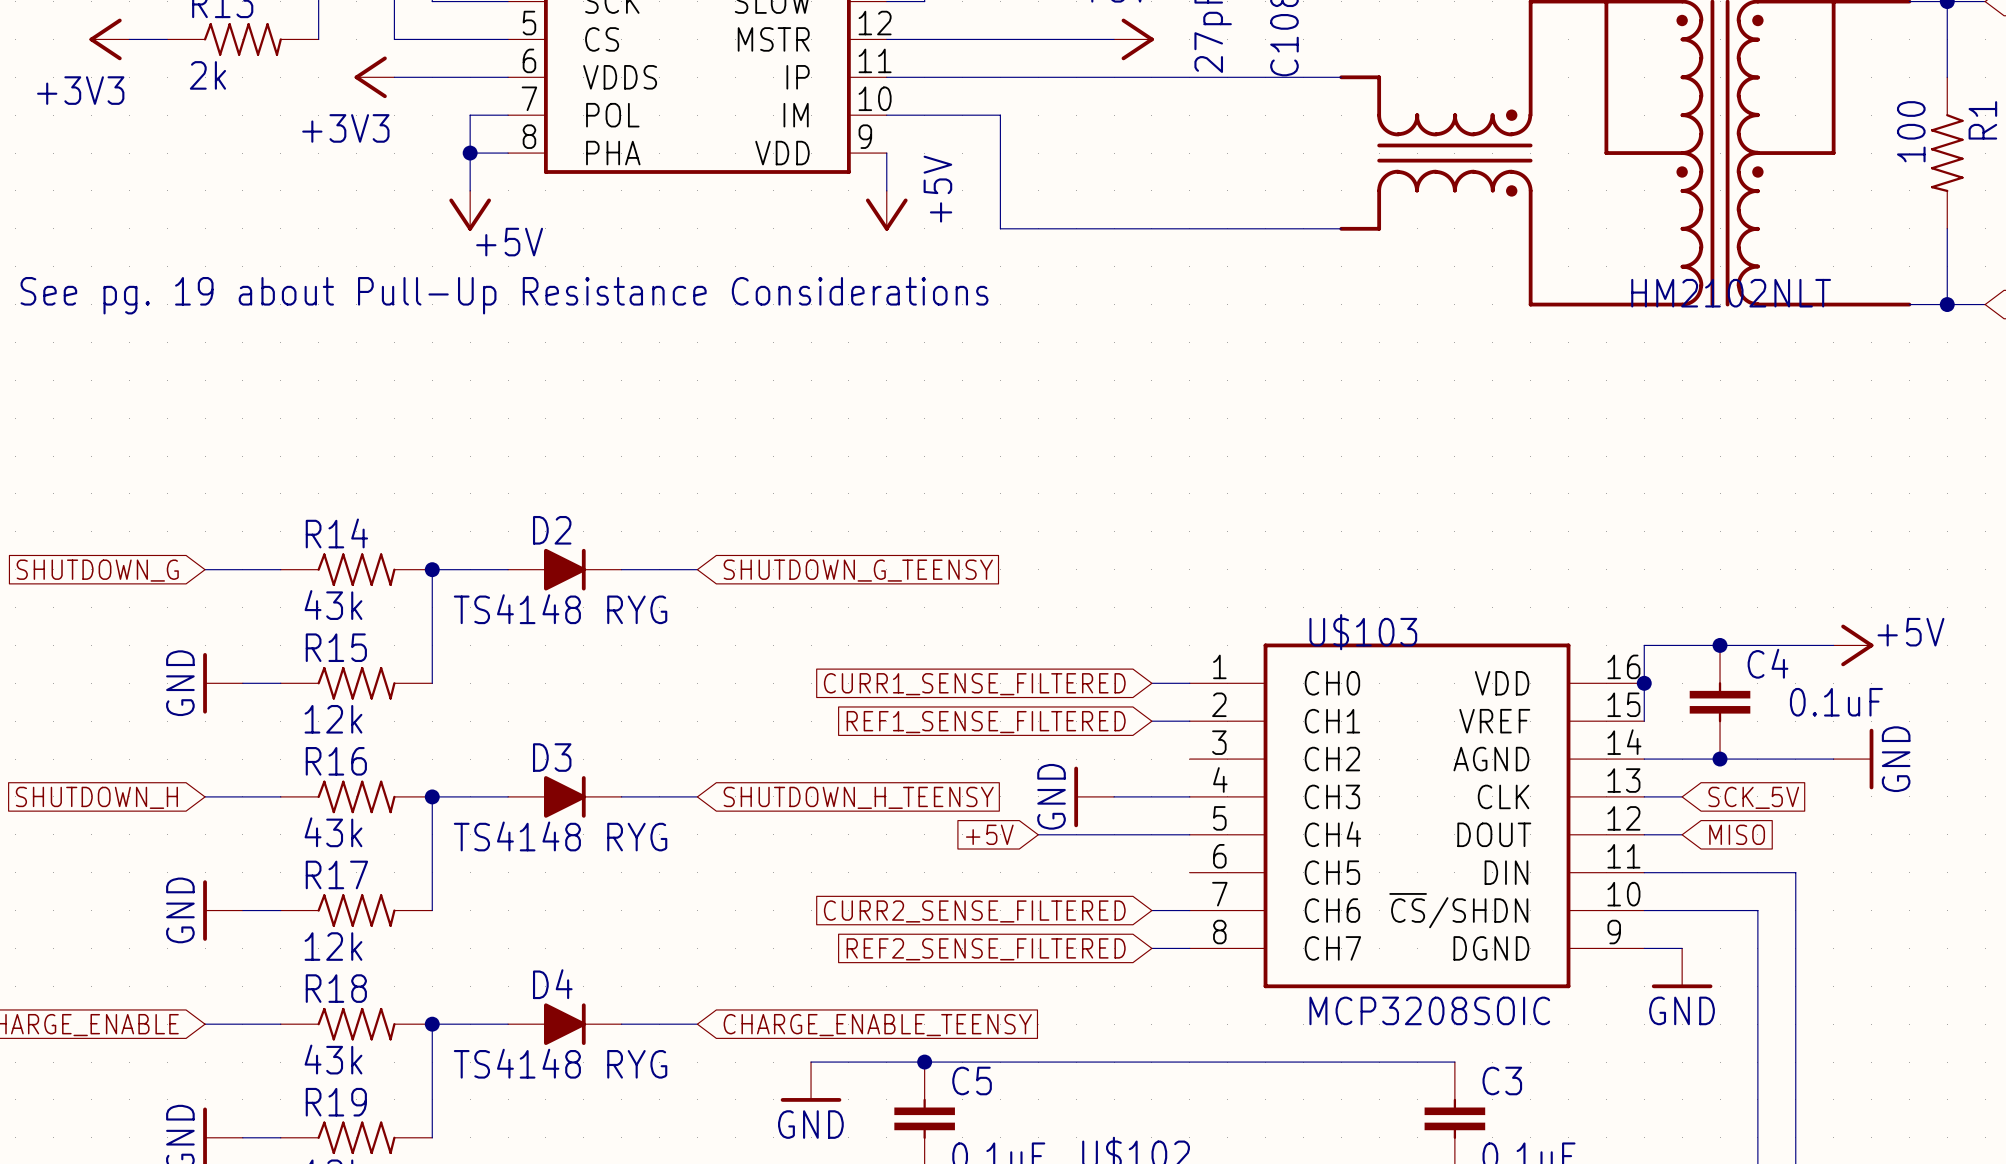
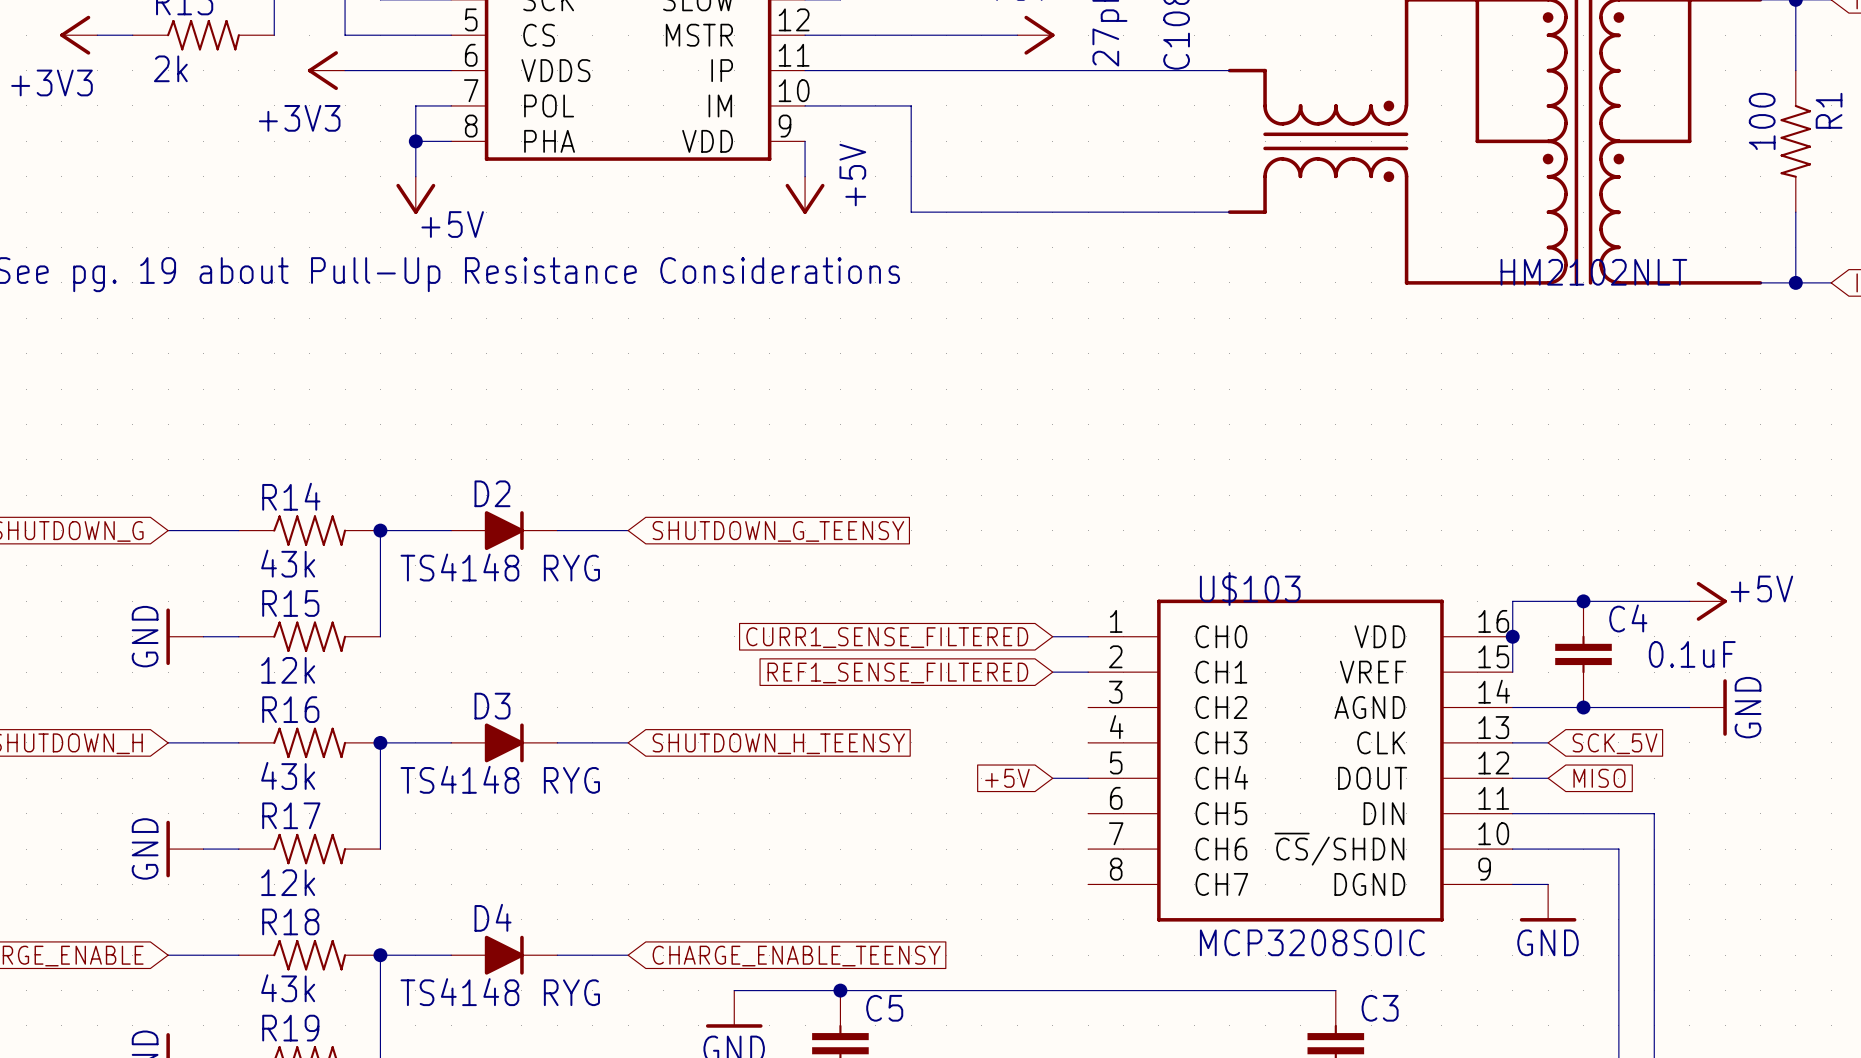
power symbol: GND (1094, 796) -> none
wire: (1114, 796) (1189, 796) -> none
global label position: +5V (989, 834) -> +5V (1007, 778)
wire: (1038, 834) (1151, 834) -> none
wire: (1151, 910) (1189, 910) -> none
global label: CURR2_SENSE_FILTERED (974, 911) -> none
wire: (1151, 948) (1189, 948) -> none
global label: REF2_SENSE_FILTERED (986, 949) -> none

